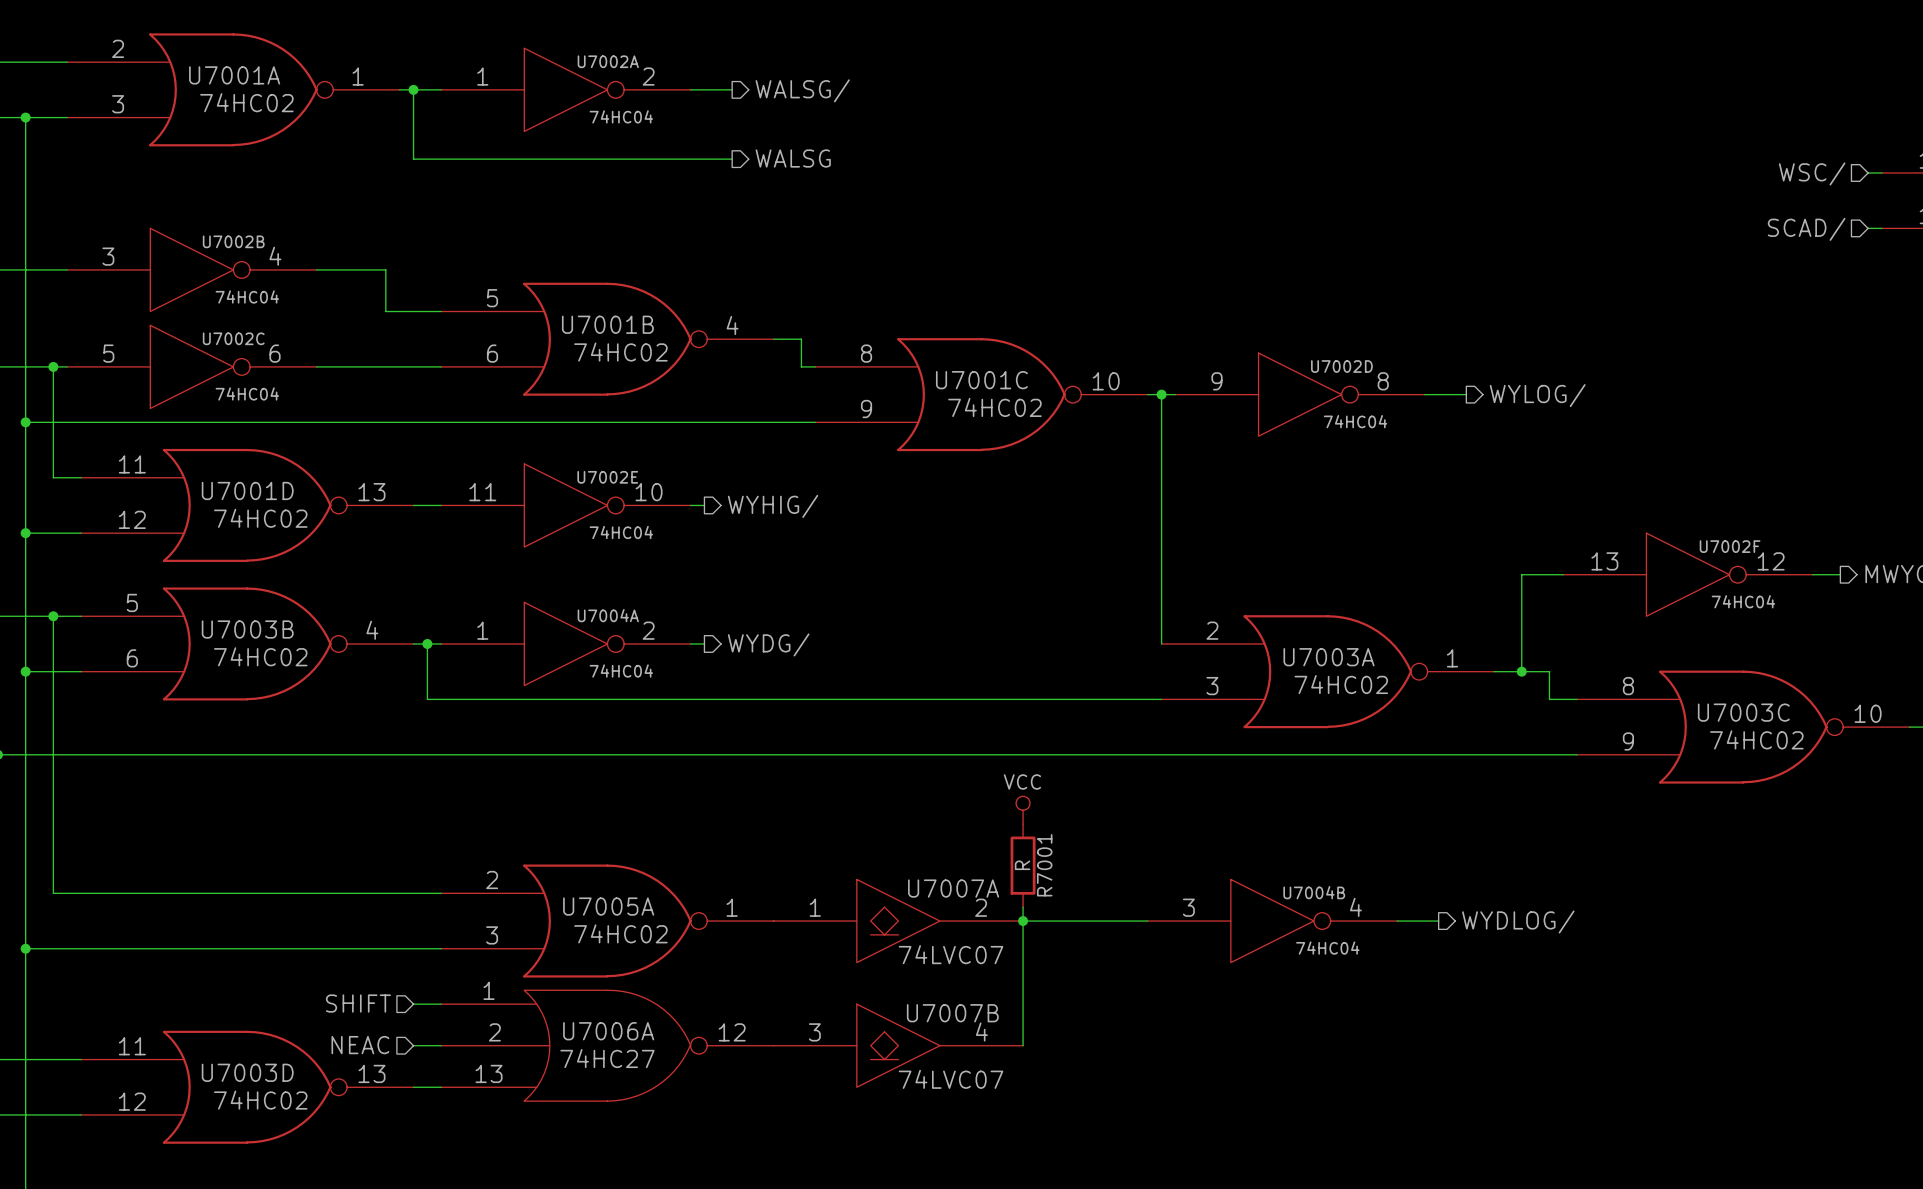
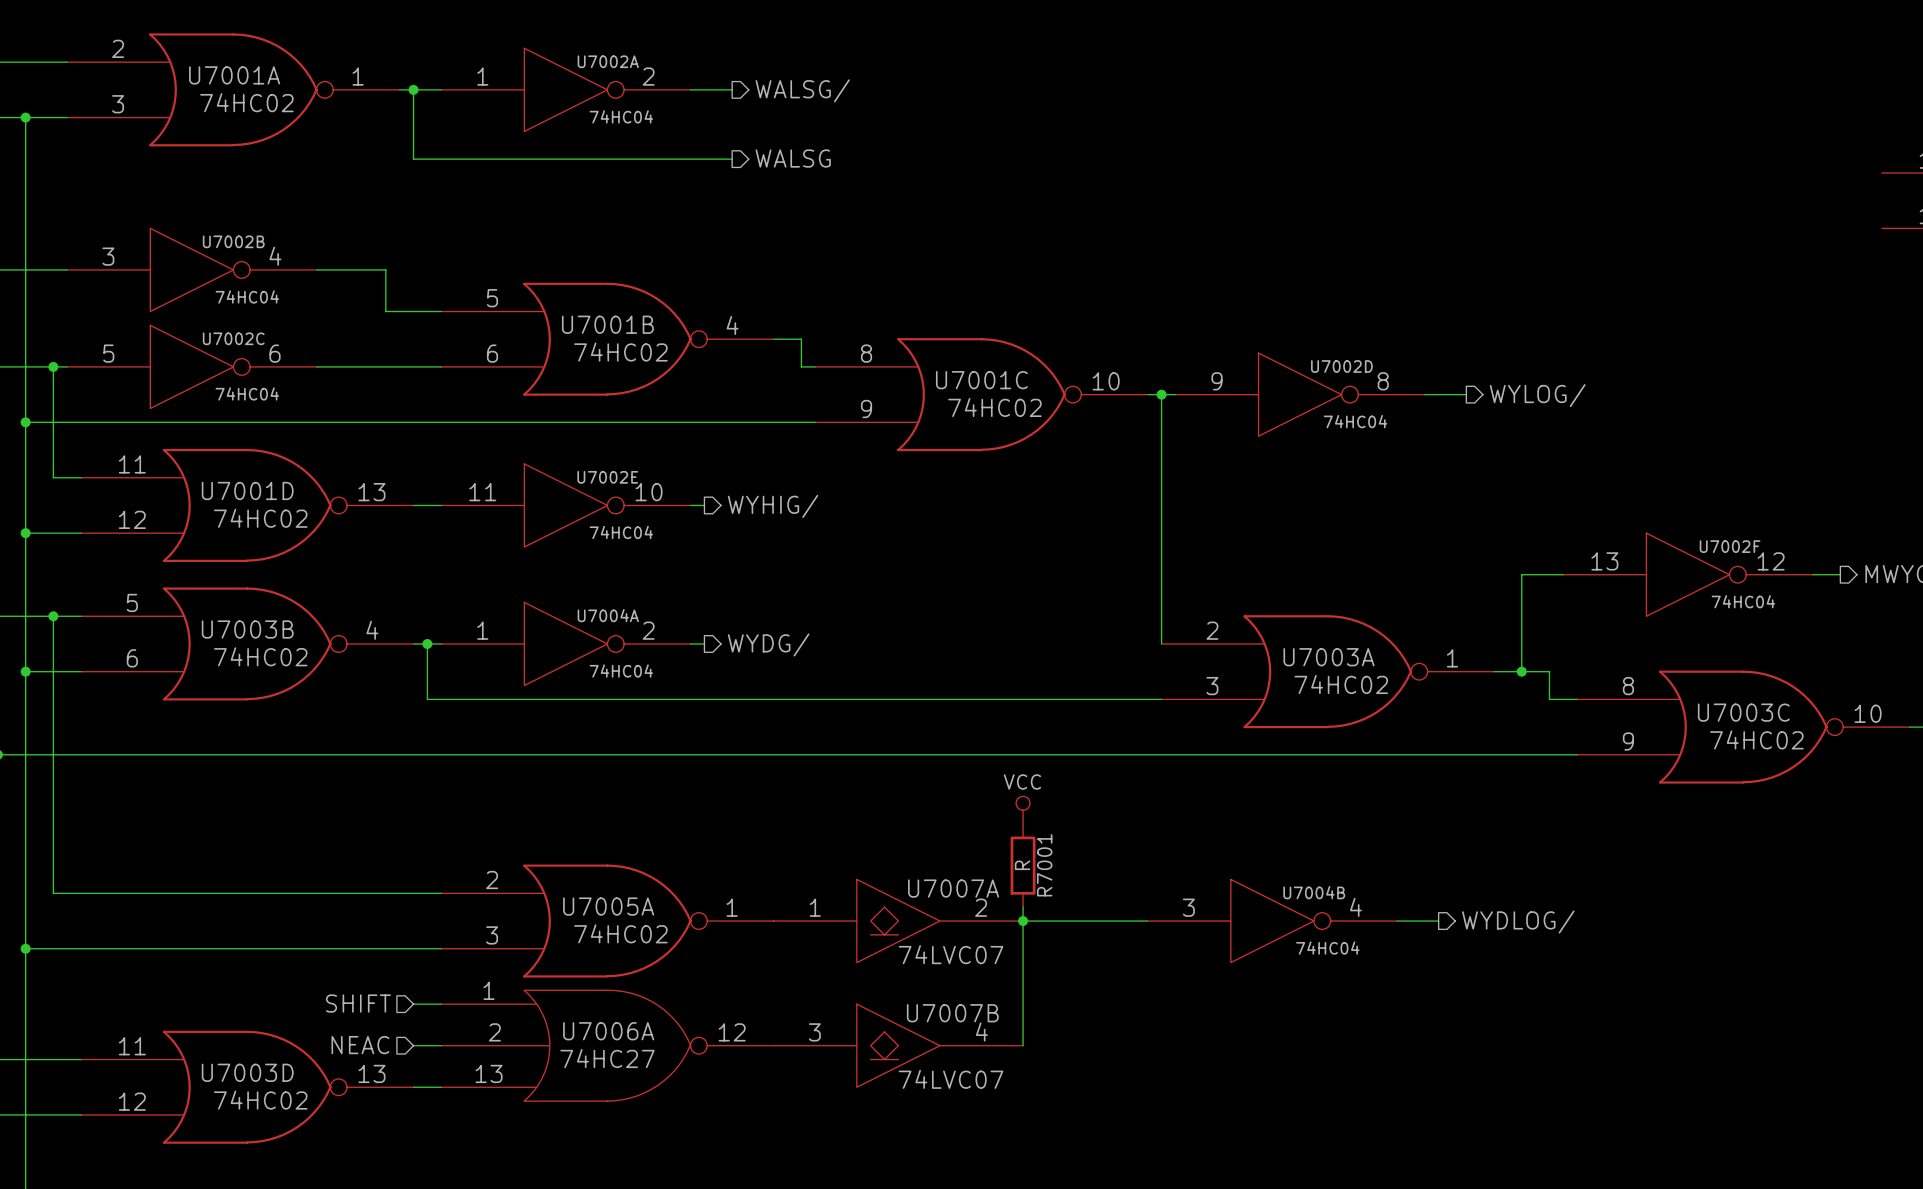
wire: (1868, 172) (1881, 172) -> none
hierarchical label: WSC/ (1812, 173) -> none
wire: (1868, 228) (1881, 228) -> none
hierarchical label: SCAD/ (1806, 229) -> none

